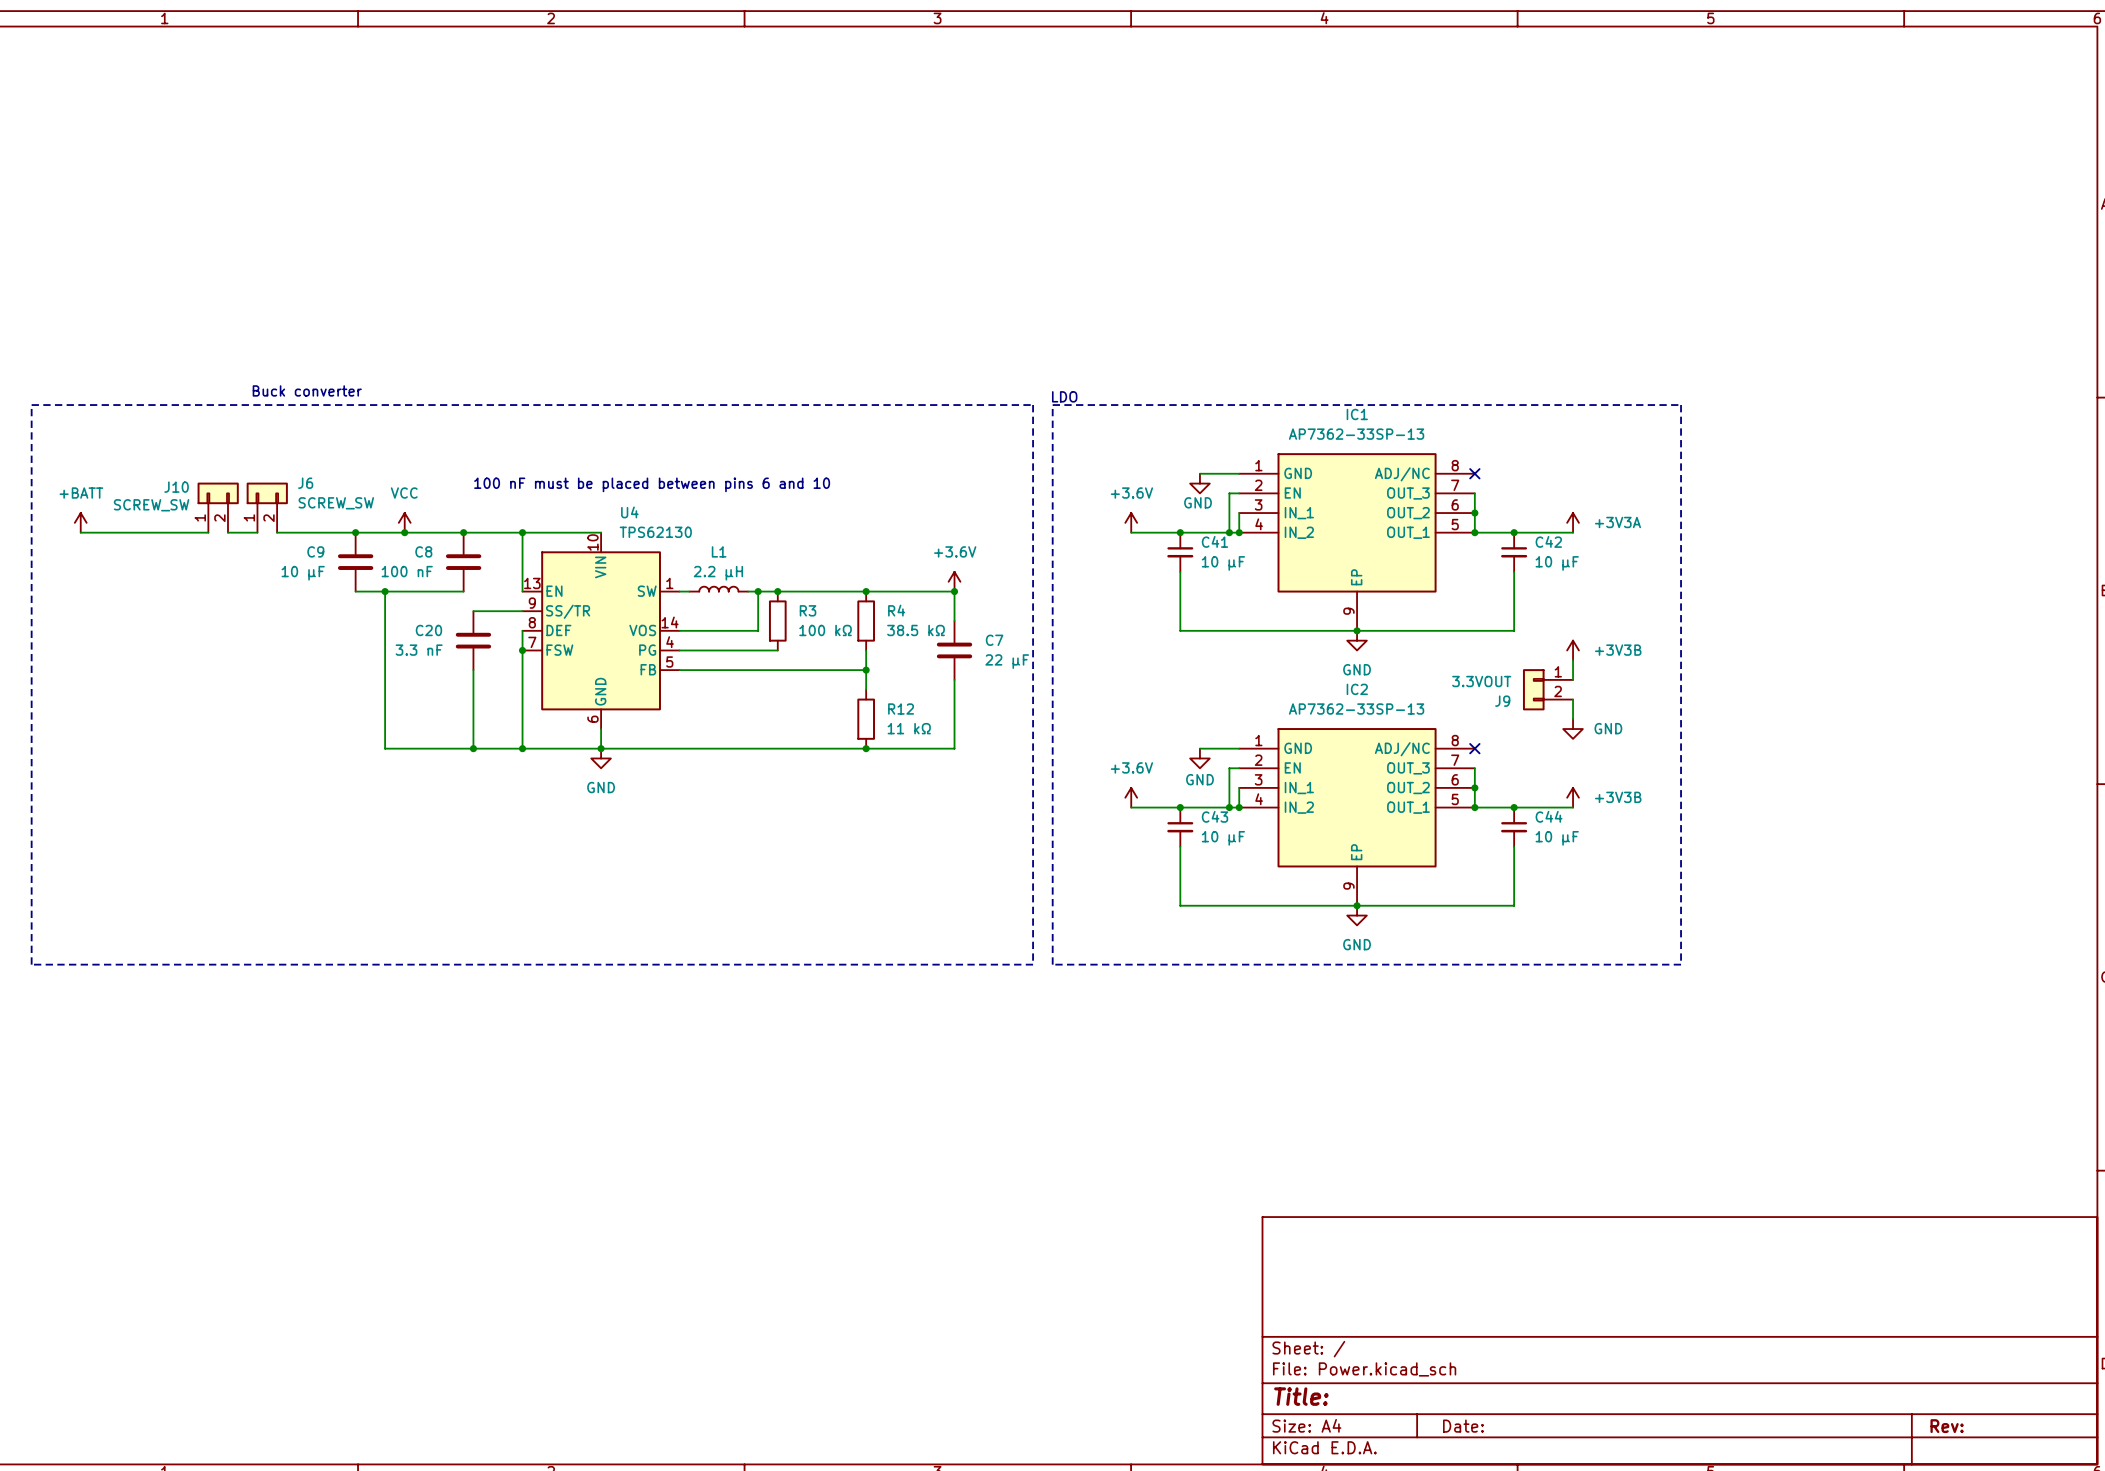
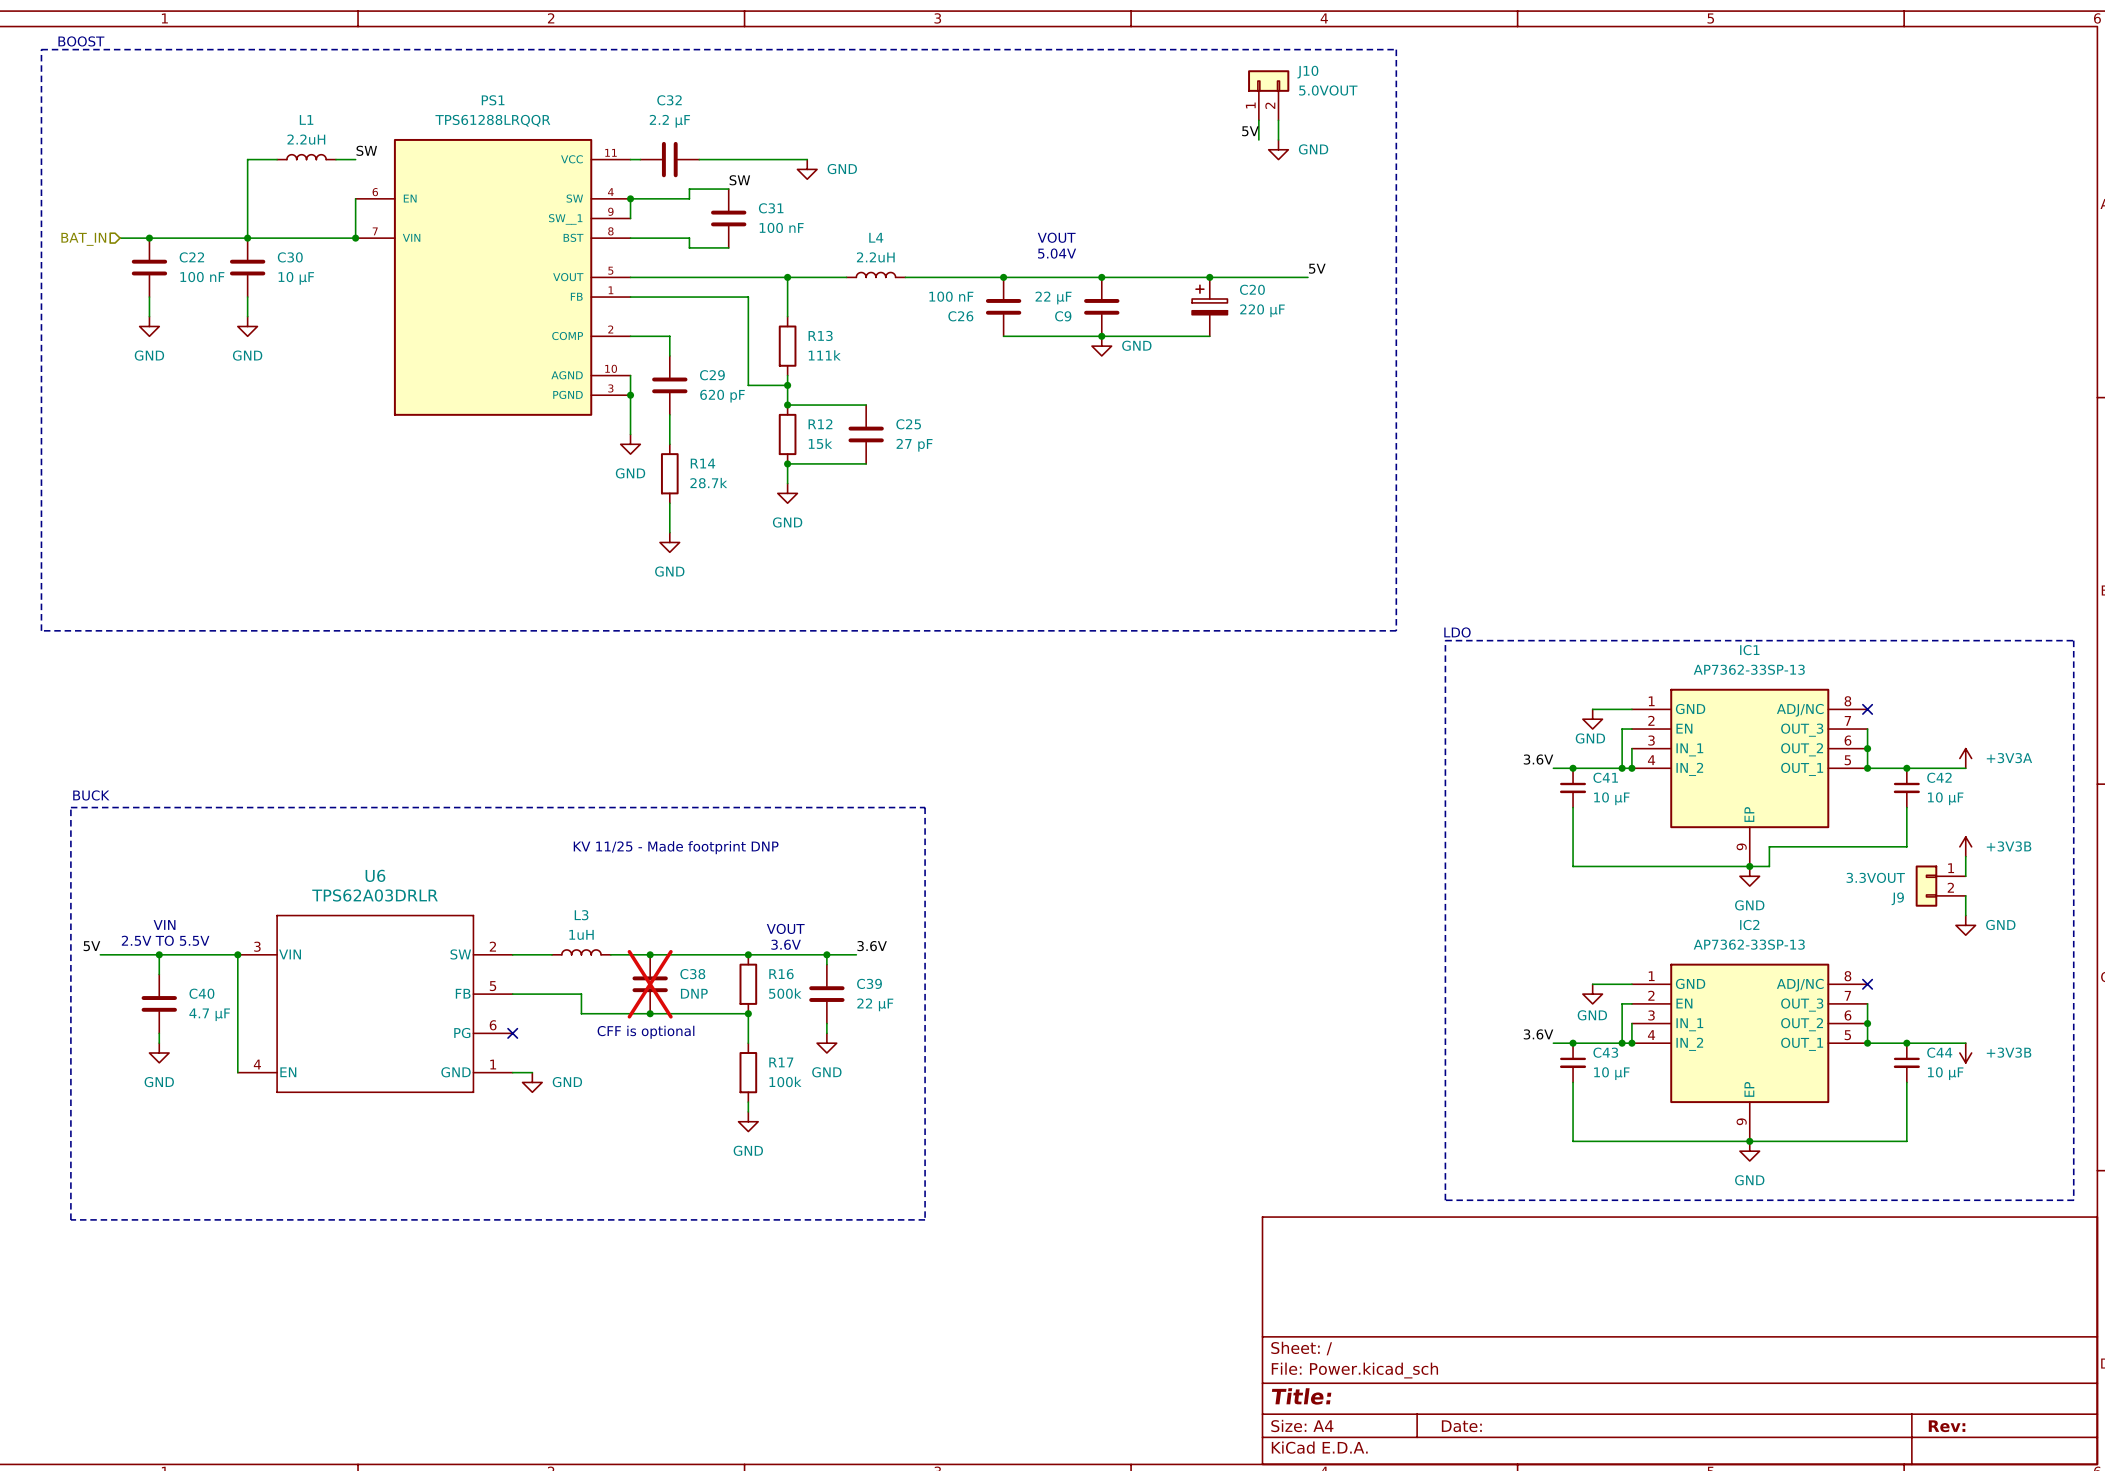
text: none -> BOOST (81, 41)
line: none -> (41, 49) (1396, 49) (1396, 630) (41, 630) (41, 49)
wire: none -> (1258, 120) (1258, 139)
wire: none -> (1278, 120) (1278, 139)
label: none -> 5V (1250, 131)
power symbol: none -> GND (1278, 149)
label: none -> SW (366, 150)
wire: none -> (277, 159) (247, 159) (247, 238)
wire: none -> (335, 159) (355, 159)
wire: none -> (630, 159) (640, 159)
C32: none -> 2.2 µF (669, 159)
wire: none -> (699, 159) (807, 159)
power symbol: none -> GND (807, 169)
label: none -> SW (739, 180)
wire: none -> (728, 189) (689, 189) (689, 198) (630, 198) (630, 218)
wire: none -> (355, 198) (355, 238) (120, 238)
junction: none -> (630, 198)
C31: none -> 100 nF (728, 218)
text: none -> VOUT (1056, 237)
hierarchical label: none -> BAT_IN (83, 239)
junction: none -> (149, 238)
junction: none -> (247, 238)
junction: none -> (355, 238)
wire: none -> (630, 238) (689, 238) (689, 247) (728, 247)
text: none -> 5.04V (1057, 253)
C22: none -> 100 nF (149, 267)
C30: none -> 10 µF (247, 267)
label: none -> 5V (1317, 268)
L4: none -> 2.2uH (875, 274)
PS1: none -> TPS61288LRQQR (493, 277)
wire: none -> (630, 277) (846, 277)
wire: none -> (787, 277) (787, 316)
junction: none -> (787, 277)
wire: none -> (905, 277) (1307, 277)
junction: none -> (1003, 277)
junction: none -> (1101, 277)
junction: none -> (1209, 277)
wire: none -> (149, 297) (149, 316)
wire: none -> (247, 297) (247, 316)
wire: none -> (630, 297) (748, 297) (748, 385) (787, 385)
C26: none -> 100 nF (1003, 306)
power symbol: none -> GND (149, 326)
power symbol: none -> GND (247, 326)
wire: none -> (630, 336) (669, 336) (669, 355)
wire: none -> (1003, 336) (1209, 336)
junction: none -> (1101, 336)
R13: none -> 111k (787, 346)
wire: none -> (787, 375) (787, 405) (866, 405)
C29: none -> 620 pF (669, 385)
junction: none -> (787, 385)
text: Buck converter (307, 390) -> none
junction: none -> (630, 395)
text: LDO (1064, 396) -> none
line: (31, 405) (1033, 405) (1033, 964) (31, 964) (31, 405) -> none
junction: none -> (787, 405)
line: (1052, 405) (1681, 405) (1681, 964) (1052, 964) (1052, 405) -> none
wire: none -> (669, 414) (669, 444)
C25: none -> 27 pF (866, 434)
power symbol: none -> GND (630, 444)
junction: none -> (787, 463)
wire: none -> (866, 463) (787, 463) (787, 483)
R14: none -> 28.7k (669, 473)
wire: (1199, 473) (1239, 473) -> none
no-connect mark: (1474, 473) -> none
power symbol position: GND (1199, 483) -> GND (1101, 346)
text: 100 nF must be placed between pins 6 and 10 (652, 484) -> none
J10 name position: J10 (176, 487) -> J10 (1307, 72)
power symbol: none -> GND (787, 493)
wire: (1239, 493) (1229, 493) (1229, 532) -> none
wire: (1474, 493) (1474, 532) (1573, 532) -> none
power symbol text position: GND (1198, 502) -> GND (1136, 345)
wire: none -> (669, 503) (669, 532)
J10 value: SCREW_SW (151, 505) -> 5.0VOUT (1328, 90)
J10 position: (218, 507) -> (1268, 95)
J6: SCREW_SW (267, 507) -> none
wire: (1239, 513) (1239, 532) (1131, 532) -> none
junction: (1474, 513) -> none
power symbol: +BATT (80, 522) -> none
power symbol: VCC (404, 522) -> none
power symbol: +3.6V (1131, 522) -> none
power symbol: +3V3A (1573, 522) -> none
wire: (80, 532) (208, 532) -> none
wire: (228, 532) (257, 532) -> none
wire: (277, 532) (601, 532) -> none
junction: (355, 532) -> none
junction: (404, 532) -> none
junction: (463, 532) -> none
wire: (522, 532) (522, 591) -> (630, 375) (630, 434)
junction: (522, 532) -> none
junction: (1180, 532) -> none
junction: (1229, 532) -> none
junction: (1239, 532) -> none
junction: (1474, 532) -> none
junction: (1514, 532) -> none
IC1 position: (1357, 541) -> (1749, 777)
power symbol: none -> GND (669, 542)
C9 name position: C9 (315, 551) -> C9 (1063, 316)
C41 position: (1180, 552) -> (1573, 787)
C42 position: (1514, 552) -> (1906, 787)
C9 position: (355, 562) -> (1101, 306)
C8: 100 nF (463, 562) -> none
wire: (1180, 571) (1180, 630) (1514, 630) (1514, 571) -> none
C9 value: 10 µF (303, 573) -> 22 µF (1053, 297)
L1 value: 2.2 µH (718, 573) -> 2.2uH (306, 139)
power symbol: +3.6V (954, 581) -> none
L1 position: (718, 589) -> (306, 157)
wire: (355, 591) (463, 591) -> none
wire: (385, 591) (385, 748) (954, 748) (954, 679) -> none
junction: (385, 591) -> none
wire: (679, 591) (689, 591) -> none
wire: (748, 591) (954, 591) (954, 621) -> none
wire: (758, 591) (758, 630) (679, 630) -> none
junction: (758, 591) -> none
junction: (777, 591) -> none
junction: (866, 591) -> none
junction: (954, 591) -> none
C20 symbol: [455, 611, 492, 671] -> [1192, 277, 1228, 337]
wire: (473, 611) (522, 611) -> none
R3: 100 kΩ (777, 621) -> none
R4: 38.5 kΩ (866, 621) -> none
C20 name position: C20 (428, 630) -> C20 (1252, 289)
wire: (522, 630) (522, 748) -> none
U4: TPS62130 (601, 630) -> none
junction: (1357, 630) -> none
text: none -> LDO (1457, 632)
power symbol: GND (1357, 640) -> none
line: none -> (1445, 640) (2073, 640) (2073, 1200) (1445, 1200) (1445, 640)
C20 value: 3.3 nF (419, 650) -> 220 µF (1262, 310)
junction: (522, 650) -> none
wire: (679, 650) (777, 650) -> none
wire: (866, 650) (866, 689) -> none
C7: 22 µF (954, 650) -> none
power symbol: +3V3B (1573, 650) -> none
wire: (1573, 660) (1573, 679) -> none
wire: (473, 670) (473, 748) -> none
wire: (679, 670) (866, 670) -> none
junction: (866, 670) -> none
J9 position: (1548, 689) -> (1940, 886)
wire: (1573, 699) (1573, 719) -> none
wire: none -> (1592, 709) (1631, 709)
no-connect mark: none -> (1867, 709)
R12 position: (866, 719) -> (787, 434)
R12 value: 11 kΩ (909, 728) -> 15k (820, 443)
power symbol text position: GND (1608, 728) -> GND (1590, 738)
wire: (601, 729) (601, 748) -> none
power symbol position: GND (1573, 729) -> GND (1592, 719)
wire: none -> (1631, 729) (1622, 729) (1622, 768)
wire: none -> (1867, 729) (1867, 768) (1965, 768)
junction: (473, 748) -> none
junction: (522, 748) -> none
junction: (601, 748) -> none
junction: (866, 748) -> none
wire: (1199, 748) (1239, 748) -> none
no-connect mark: (1474, 748) -> none
wire: none -> (1631, 748) (1631, 768) (1553, 768)
junction: none -> (1867, 748)
power symbol: GND (601, 758) -> none
power symbol: GND (1199, 758) -> none
power symbol: none -> +3V3A (1965, 758)
label: none -> 3.6V (1538, 759)
wire: (1239, 768) (1229, 768) (1229, 807) -> none
wire: (1474, 768) (1474, 807) (1573, 807) -> (1906, 807) (1906, 846) (1769, 846) (1769, 866) (1573, 866) (1573, 807)
junction: none -> (1573, 768)
junction: none -> (1622, 768)
junction: none -> (1631, 768)
junction: none -> (1867, 768)
junction: none -> (1906, 768)
wire: (1239, 787) (1239, 807) (1131, 807) -> none
junction: (1474, 787) -> none
text: none -> BUCK (91, 795)
power symbol: +3.6V (1131, 797) -> none
power symbol: +3V3B (1573, 797) -> none
line: none -> (70, 807) (925, 807) (925, 1219) (70, 1219) (70, 807)
junction: (1180, 807) -> none
junction: (1229, 807) -> none
junction: (1239, 807) -> none
junction: (1474, 807) -> none
junction: (1514, 807) -> none
IC2 position: (1357, 816) -> (1749, 1052)
C43 position: (1180, 827) -> (1573, 1062)
C44 position: (1514, 827) -> (1906, 1062)
wire: (1180, 846) (1180, 905) (1514, 905) (1514, 846) -> none
power symbol: none -> +3V3B (1965, 846)
text: none -> KV 11/25 - Made footprint DNP (676, 847)
wire: none -> (1965, 856) (1965, 876)
junction: none -> (1749, 866)
power symbol: none -> GND (1749, 876)
wire: none -> (1965, 895) (1965, 915)
junction: (1357, 905) -> none
power symbol: GND (1357, 915) -> none
text: none -> VIN (164, 924)
power symbol: none -> GND (1965, 925)
text: none -> VOUT (785, 928)
text: none -> 2.5V TO 5.5V (165, 940)
text: none -> 3.6V (786, 944)
label: none -> 5V (91, 946)
label: none -> 3.6V (872, 946)
L3: none -> 1uH (581, 952)
wire: none -> (100, 954) (237, 954) (237, 1072)
wire: none -> (159, 954) (159, 974)
junction: none -> (159, 954)
junction: none -> (237, 954)
wire: none -> (512, 954) (551, 954)
wire: none -> (610, 954) (856, 954)
junction: none -> (650, 954)
junction: none -> (748, 954)
wire: none -> (826, 954) (826, 964)
junction: none -> (826, 954)
C38: none -> DNP (650, 984)
R16: none -> 500k (748, 984)
wire: none -> (1592, 984) (1631, 984)
no-connect mark: none -> (1867, 984)
wire: none -> (512, 994) (581, 994) (581, 1013) (748, 1013) (748, 1043)
C39: none -> 22 µF (826, 994)
power symbol: none -> GND (1592, 994)
C40: none -> 4.7 µF (159, 1003)
U6: none -> TPS62A03DRLR (375, 1003)
wire: none -> (1631, 1003) (1622, 1003) (1622, 1043)
wire: none -> (1867, 1003) (1867, 1043) (1965, 1043)
junction: none -> (650, 1013)
junction: none -> (748, 1013)
wire: none -> (826, 1023) (826, 1033)
wire: none -> (1631, 1023) (1631, 1043) (1553, 1043)
junction: none -> (1867, 1023)
text: none -> CFF is optional (645, 1032)
wire: none -> (159, 1033) (159, 1043)
no-connect mark: none -> (512, 1033)
label: none -> 3.6V (1538, 1034)
power symbol: none -> GND (826, 1043)
junction: none -> (1573, 1043)
junction: none -> (1622, 1043)
junction: none -> (1631, 1043)
junction: none -> (1867, 1043)
junction: none -> (1906, 1043)
power symbol: none -> GND (159, 1053)
power symbol: none -> +3V3B (1965, 1053)
wire: none -> (512, 1072) (532, 1072)
R17: none -> 100k (748, 1072)
power symbol: none -> GND (532, 1082)
wire: none -> (1573, 1082) (1573, 1141) (1906, 1141) (1906, 1082)
wire: none -> (748, 1102) (748, 1111)
power symbol: none -> GND (748, 1121)
junction: none -> (1749, 1141)
power symbol: none -> GND (1749, 1151)

